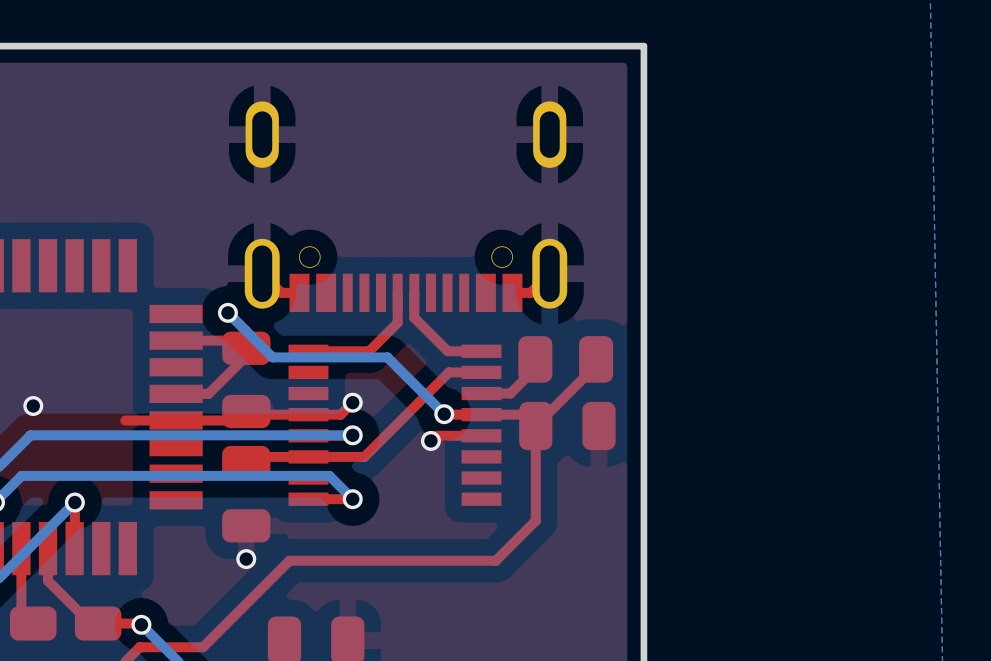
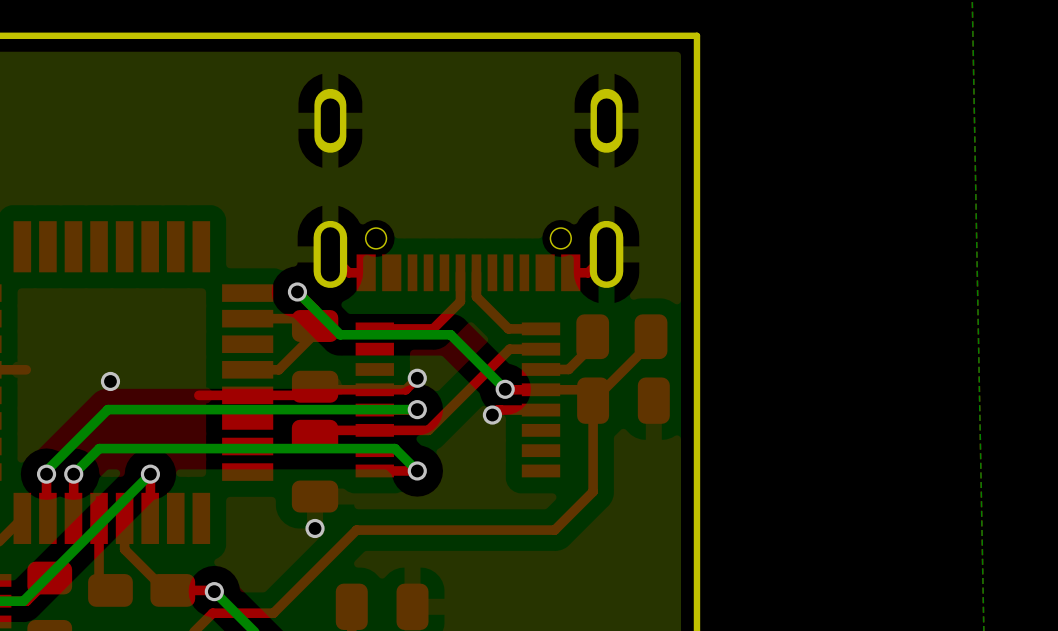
part footprint: [244, 101, 568, 313] -> [313, 88, 624, 292]

